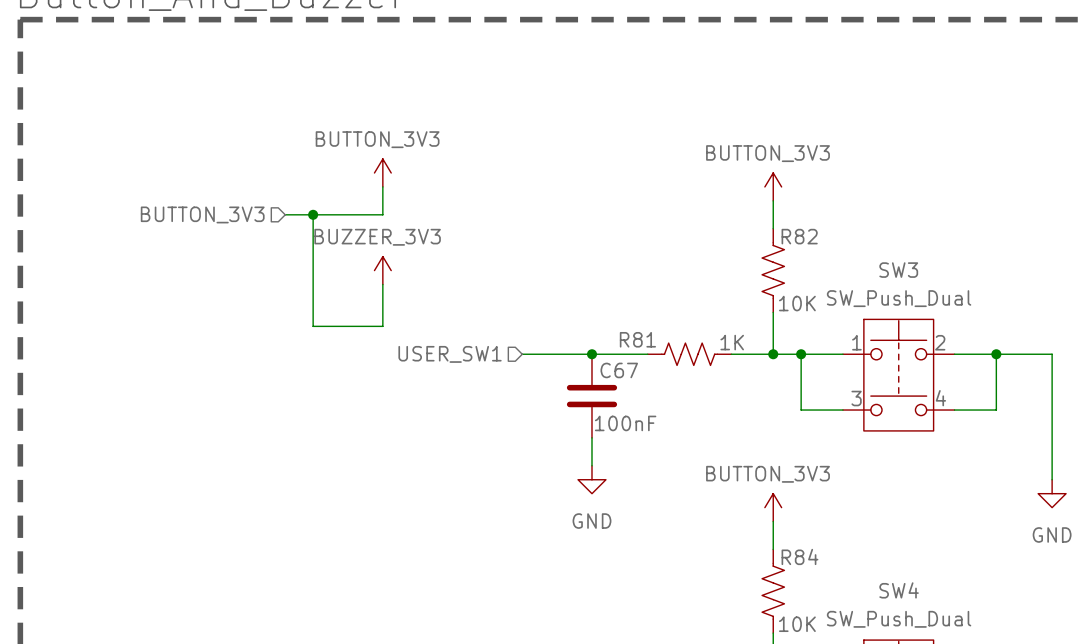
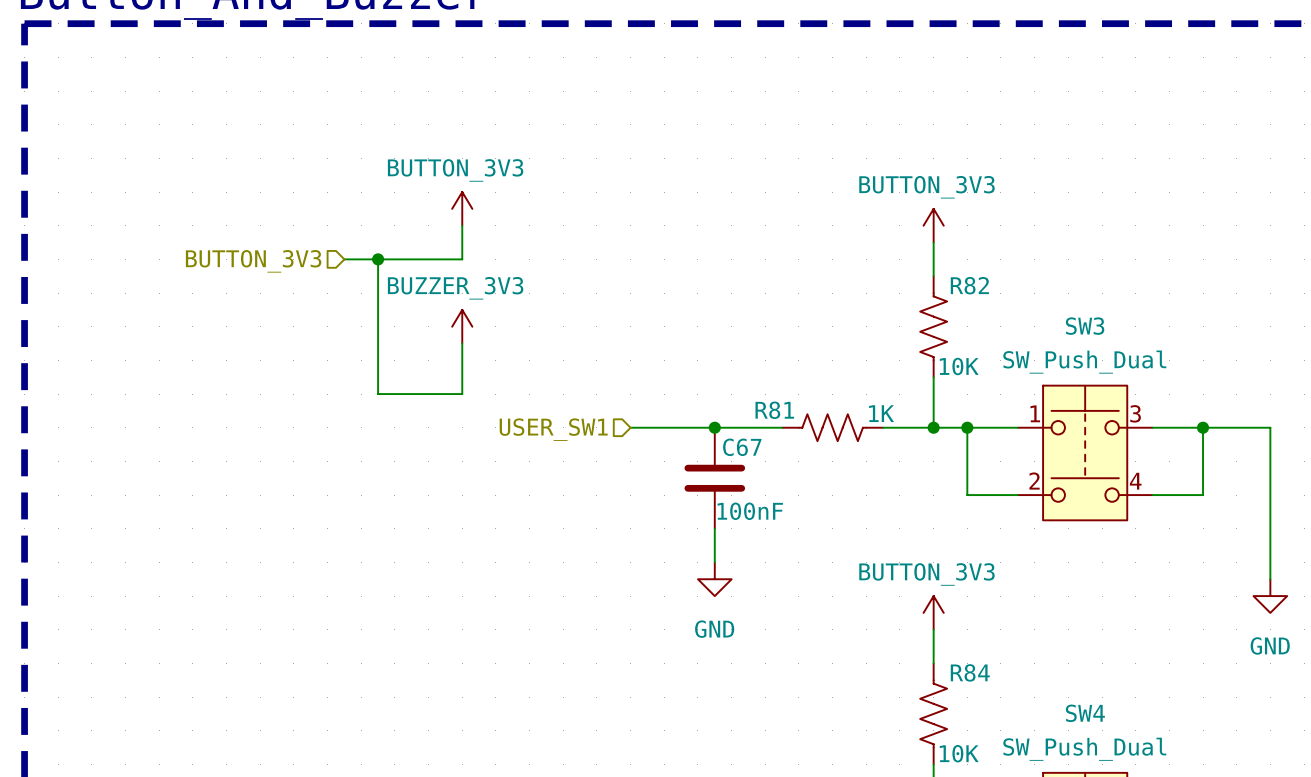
SW3 pin number: 2 (940, 342) -> 3 (1135, 413)
SW3 pin number: 3 (856, 398) -> 2 (1034, 481)

